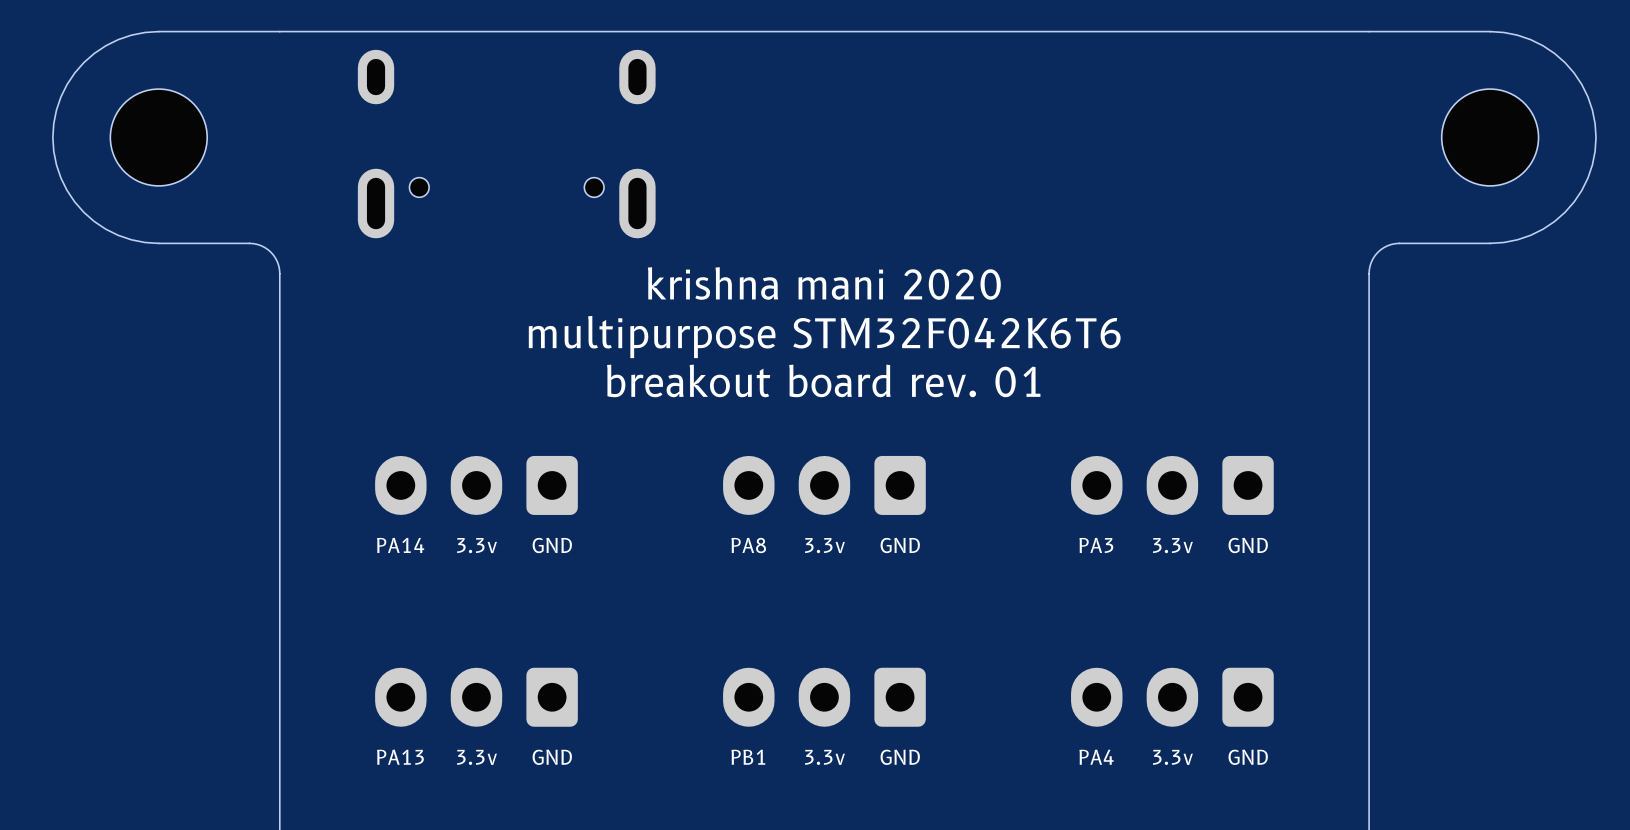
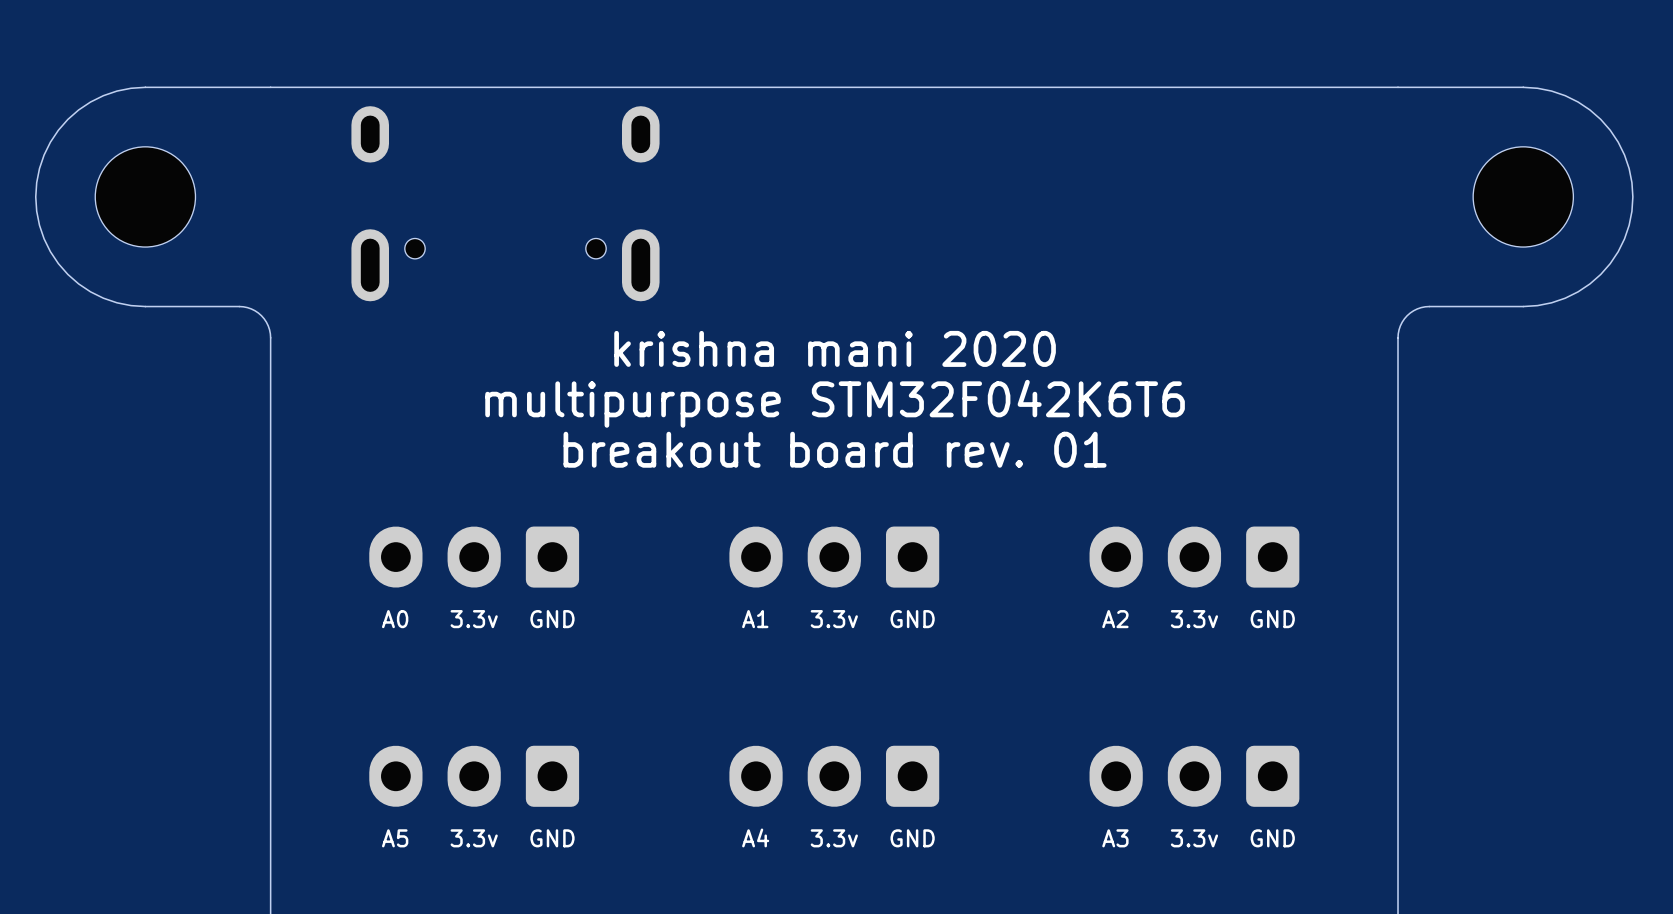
text: PA14 (400, 545) -> A0 (395, 619)
text: PA8 (748, 545) -> A1 (755, 619)
text: PA3 (1096, 545) -> A2 (1115, 619)
text: PA13 (400, 757) -> A5 (395, 838)
text: PB1 (748, 757) -> A4 (755, 837)
text: PA4 (1096, 757) -> A3 (1115, 838)

